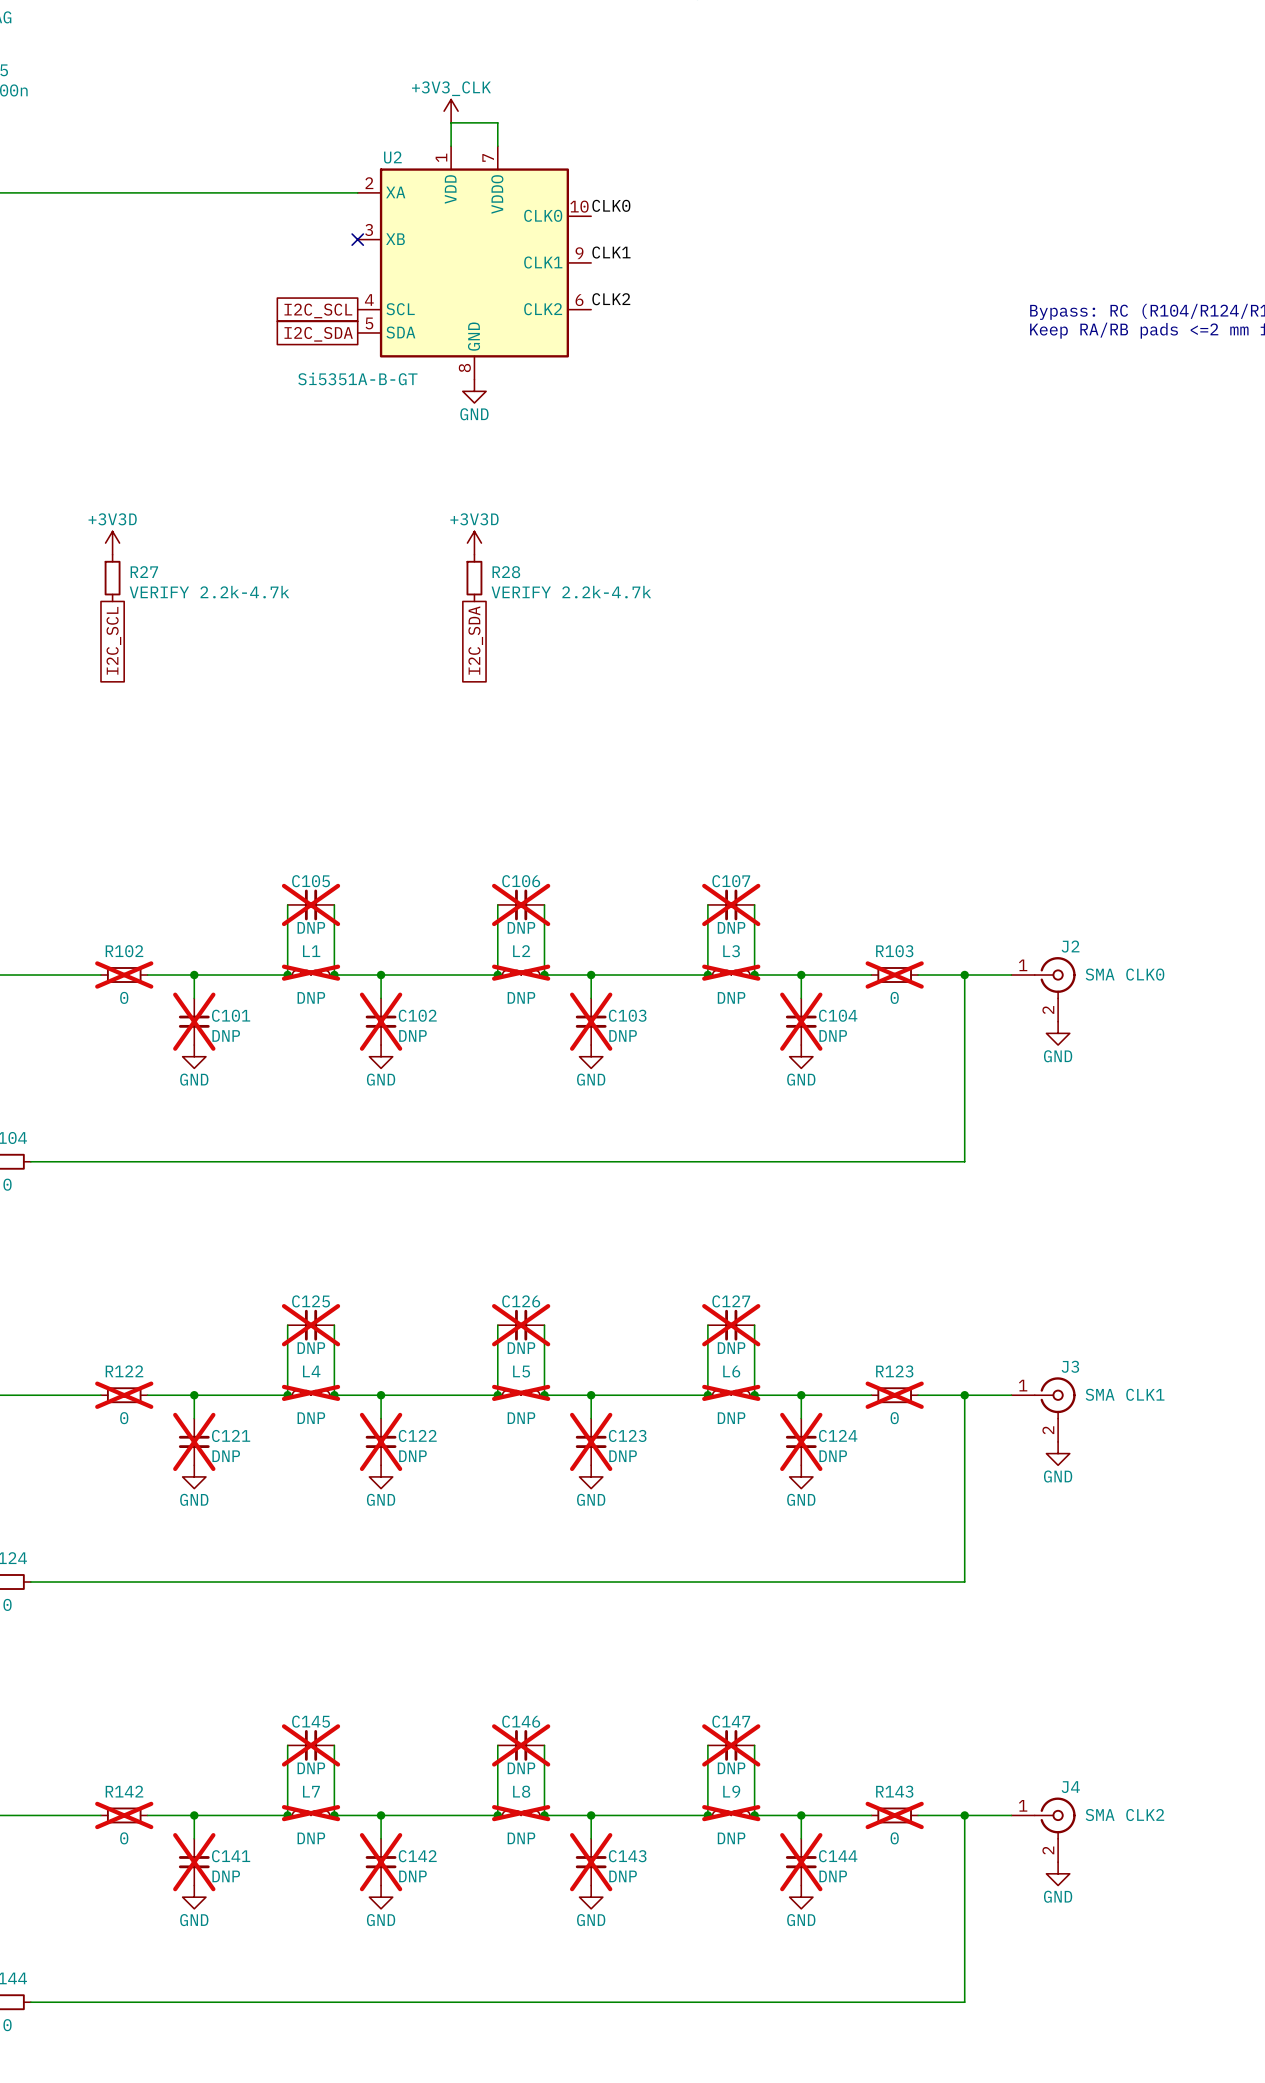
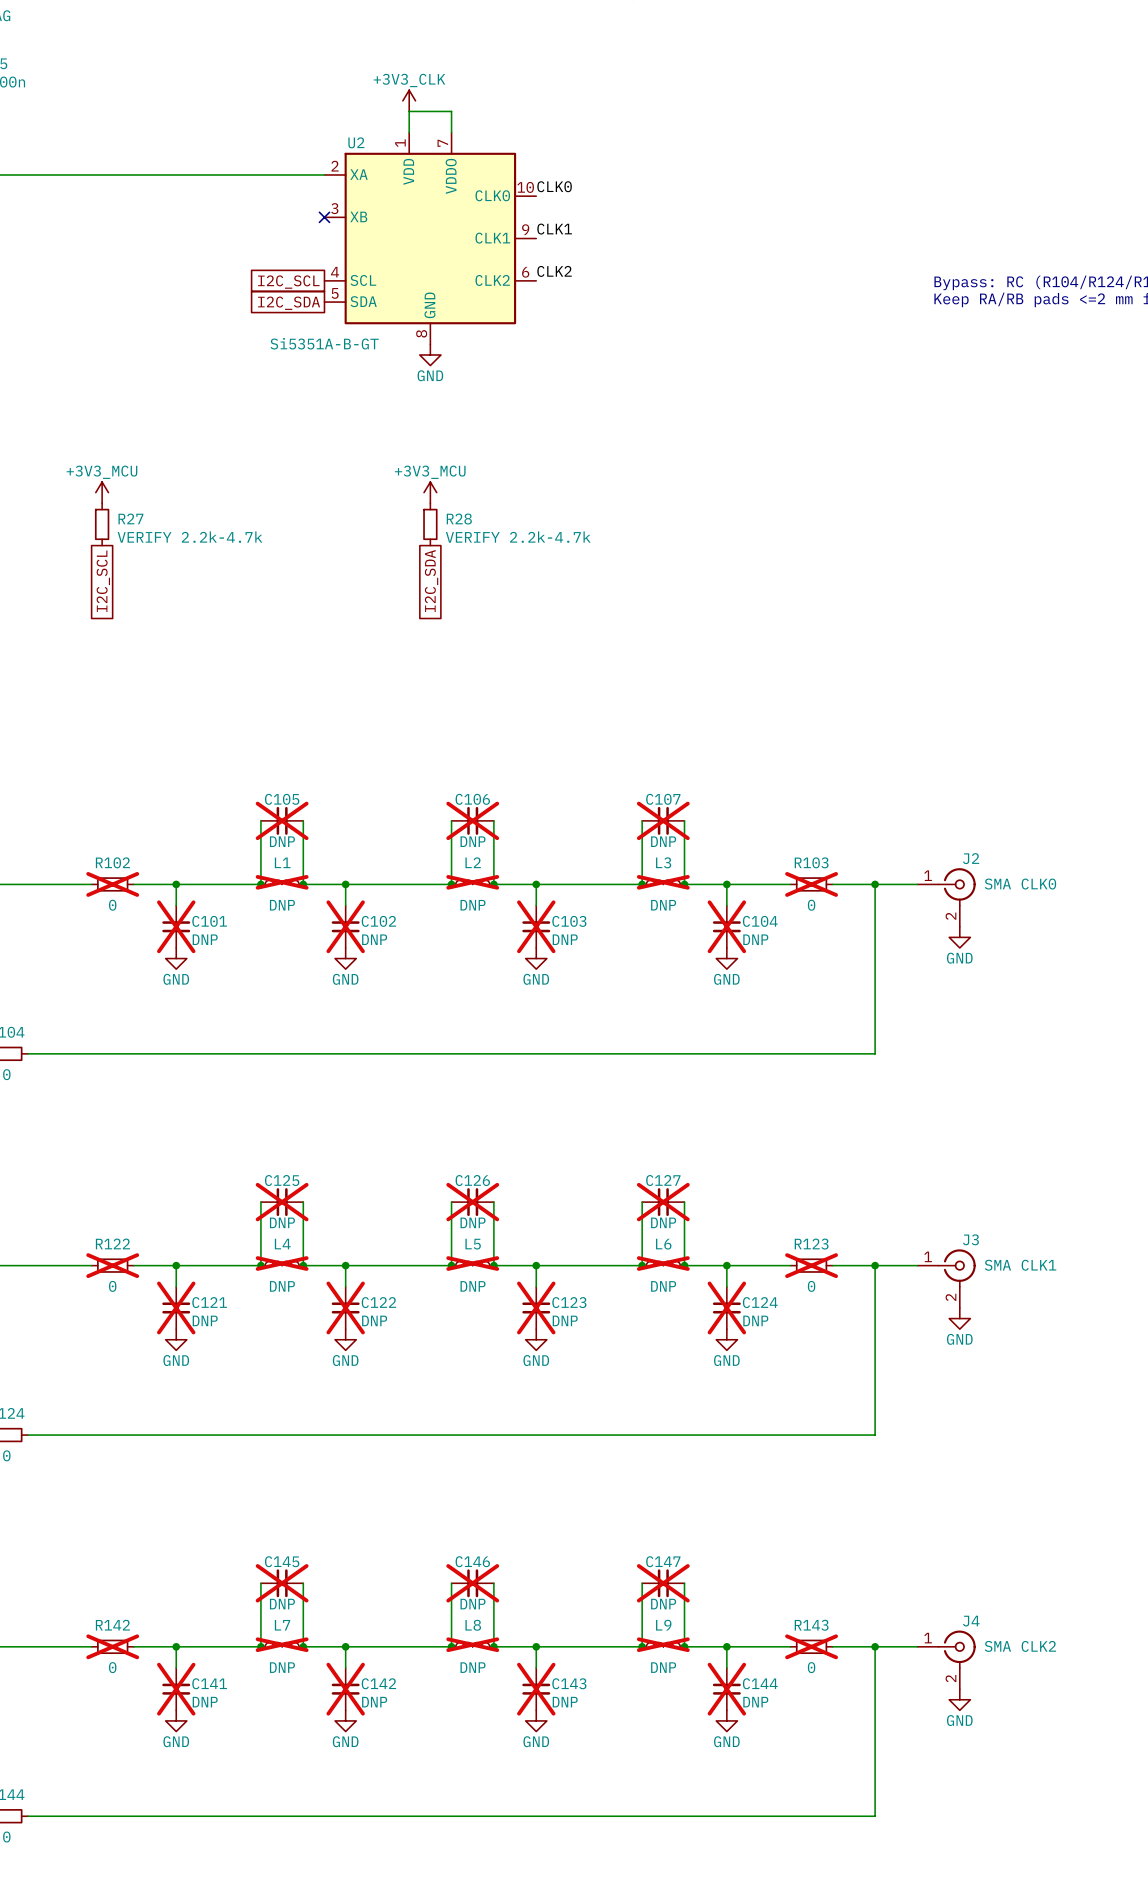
power symbol: +3V3D (112, 543) -> +3V3_MCU (102, 492)
power symbol: +3V3D (474, 543) -> +3V3_MCU (430, 492)

